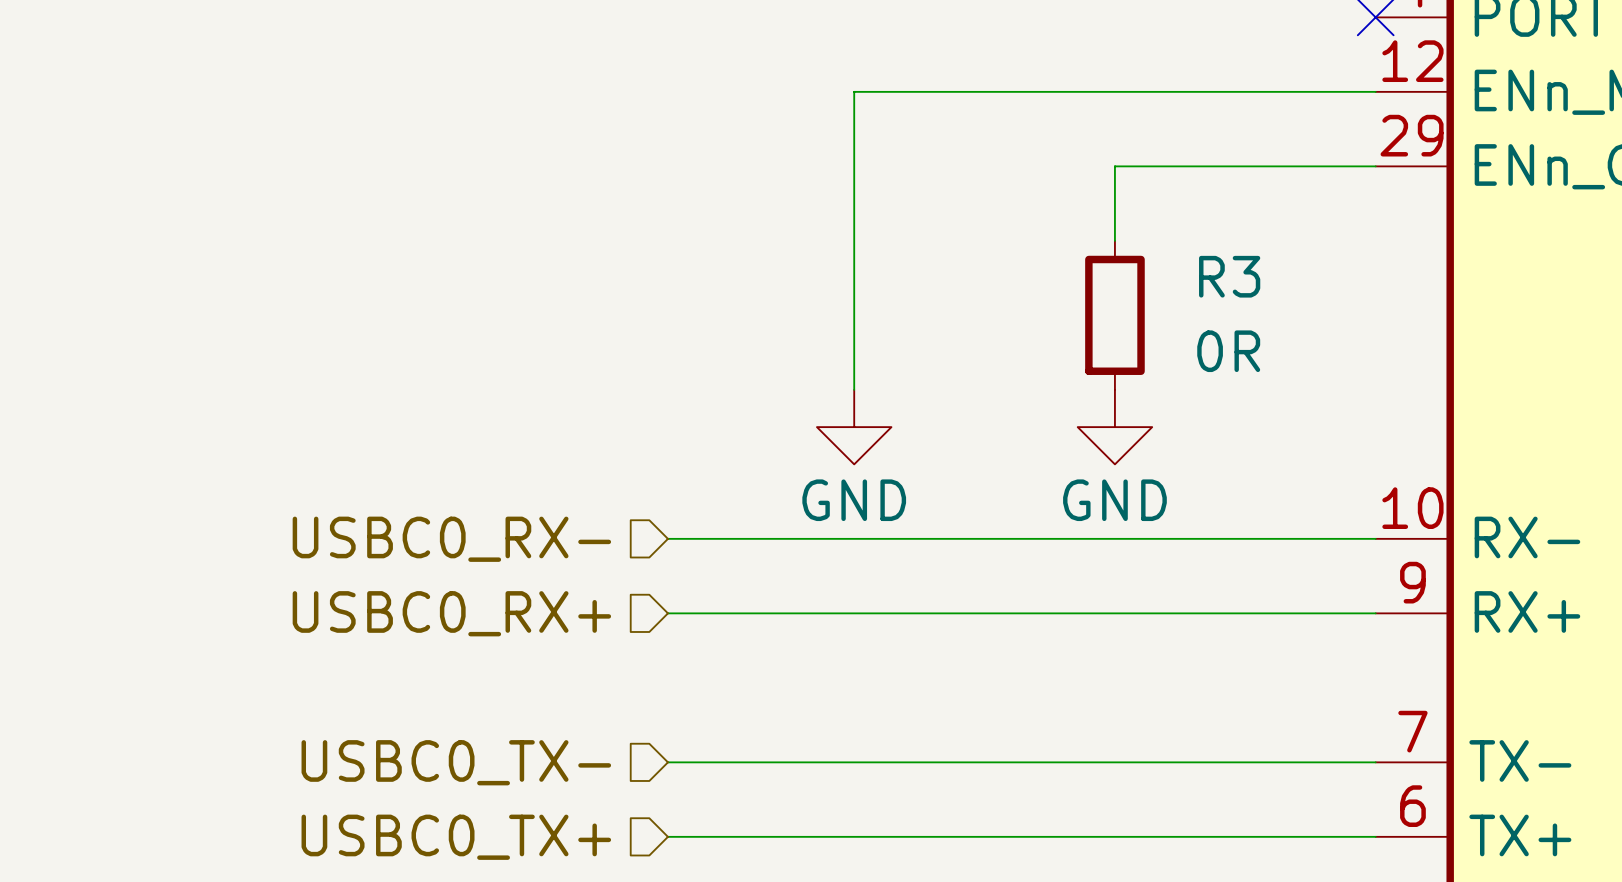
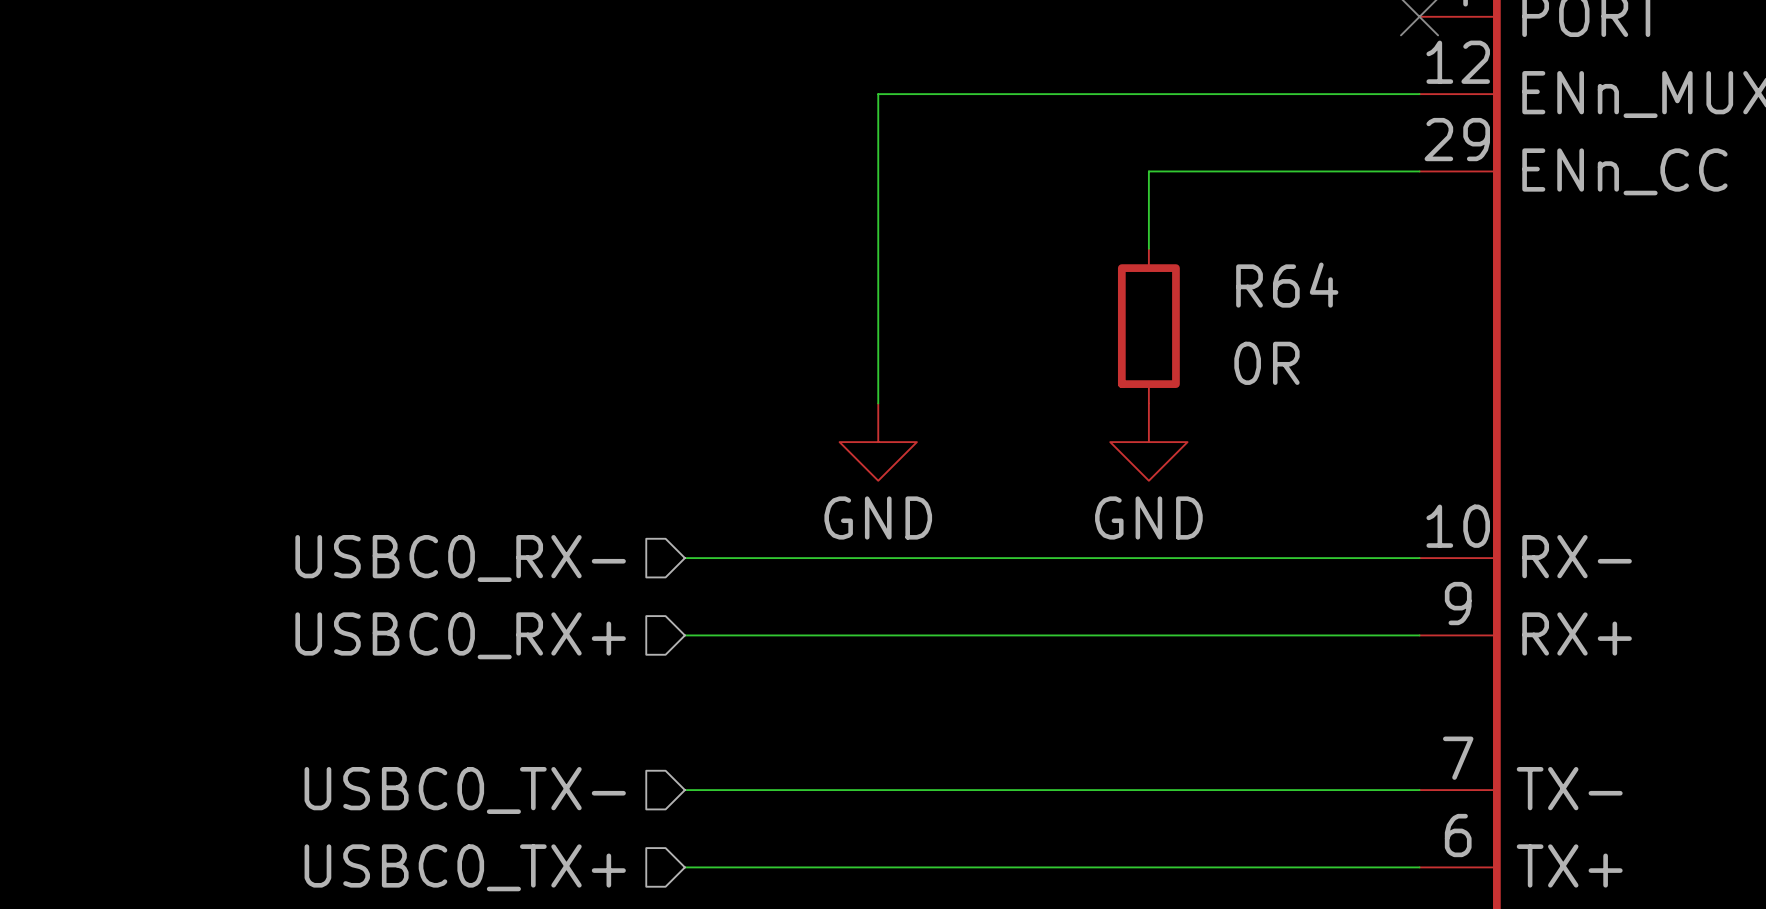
R3 name: R3 (1229, 276) -> R64 (1287, 285)

